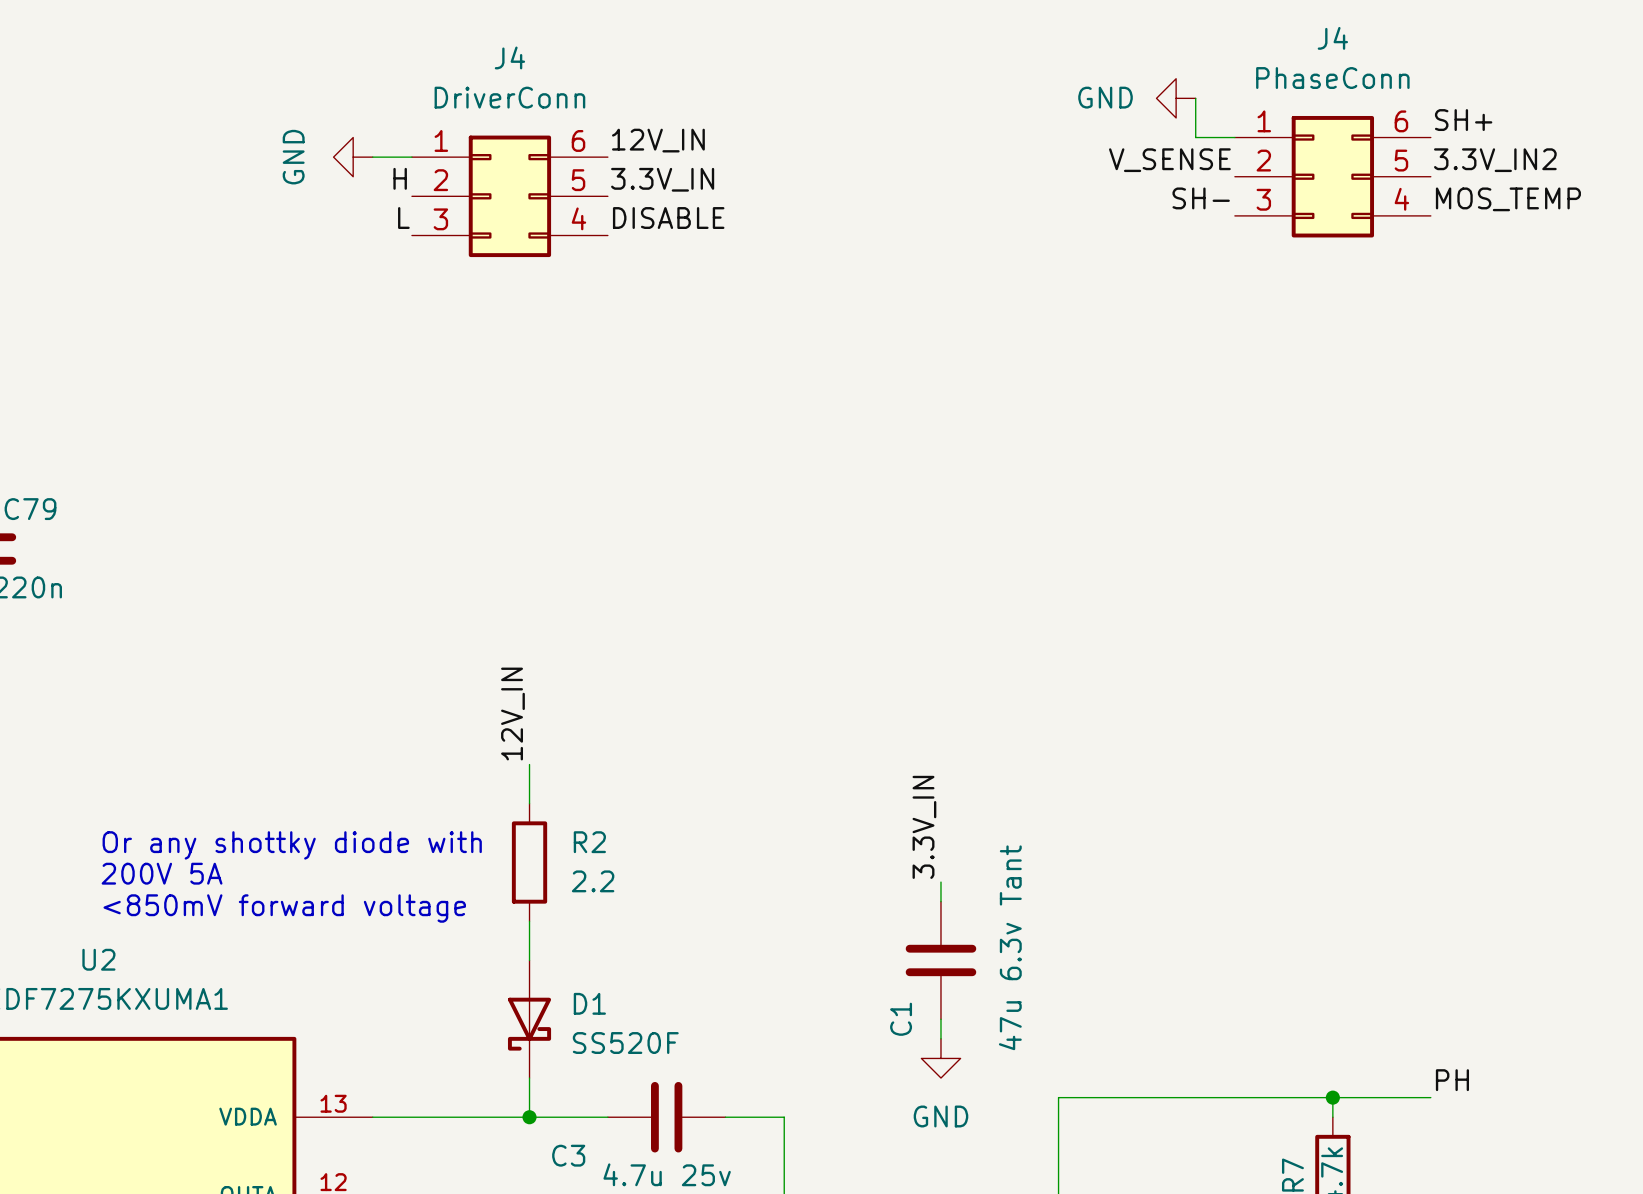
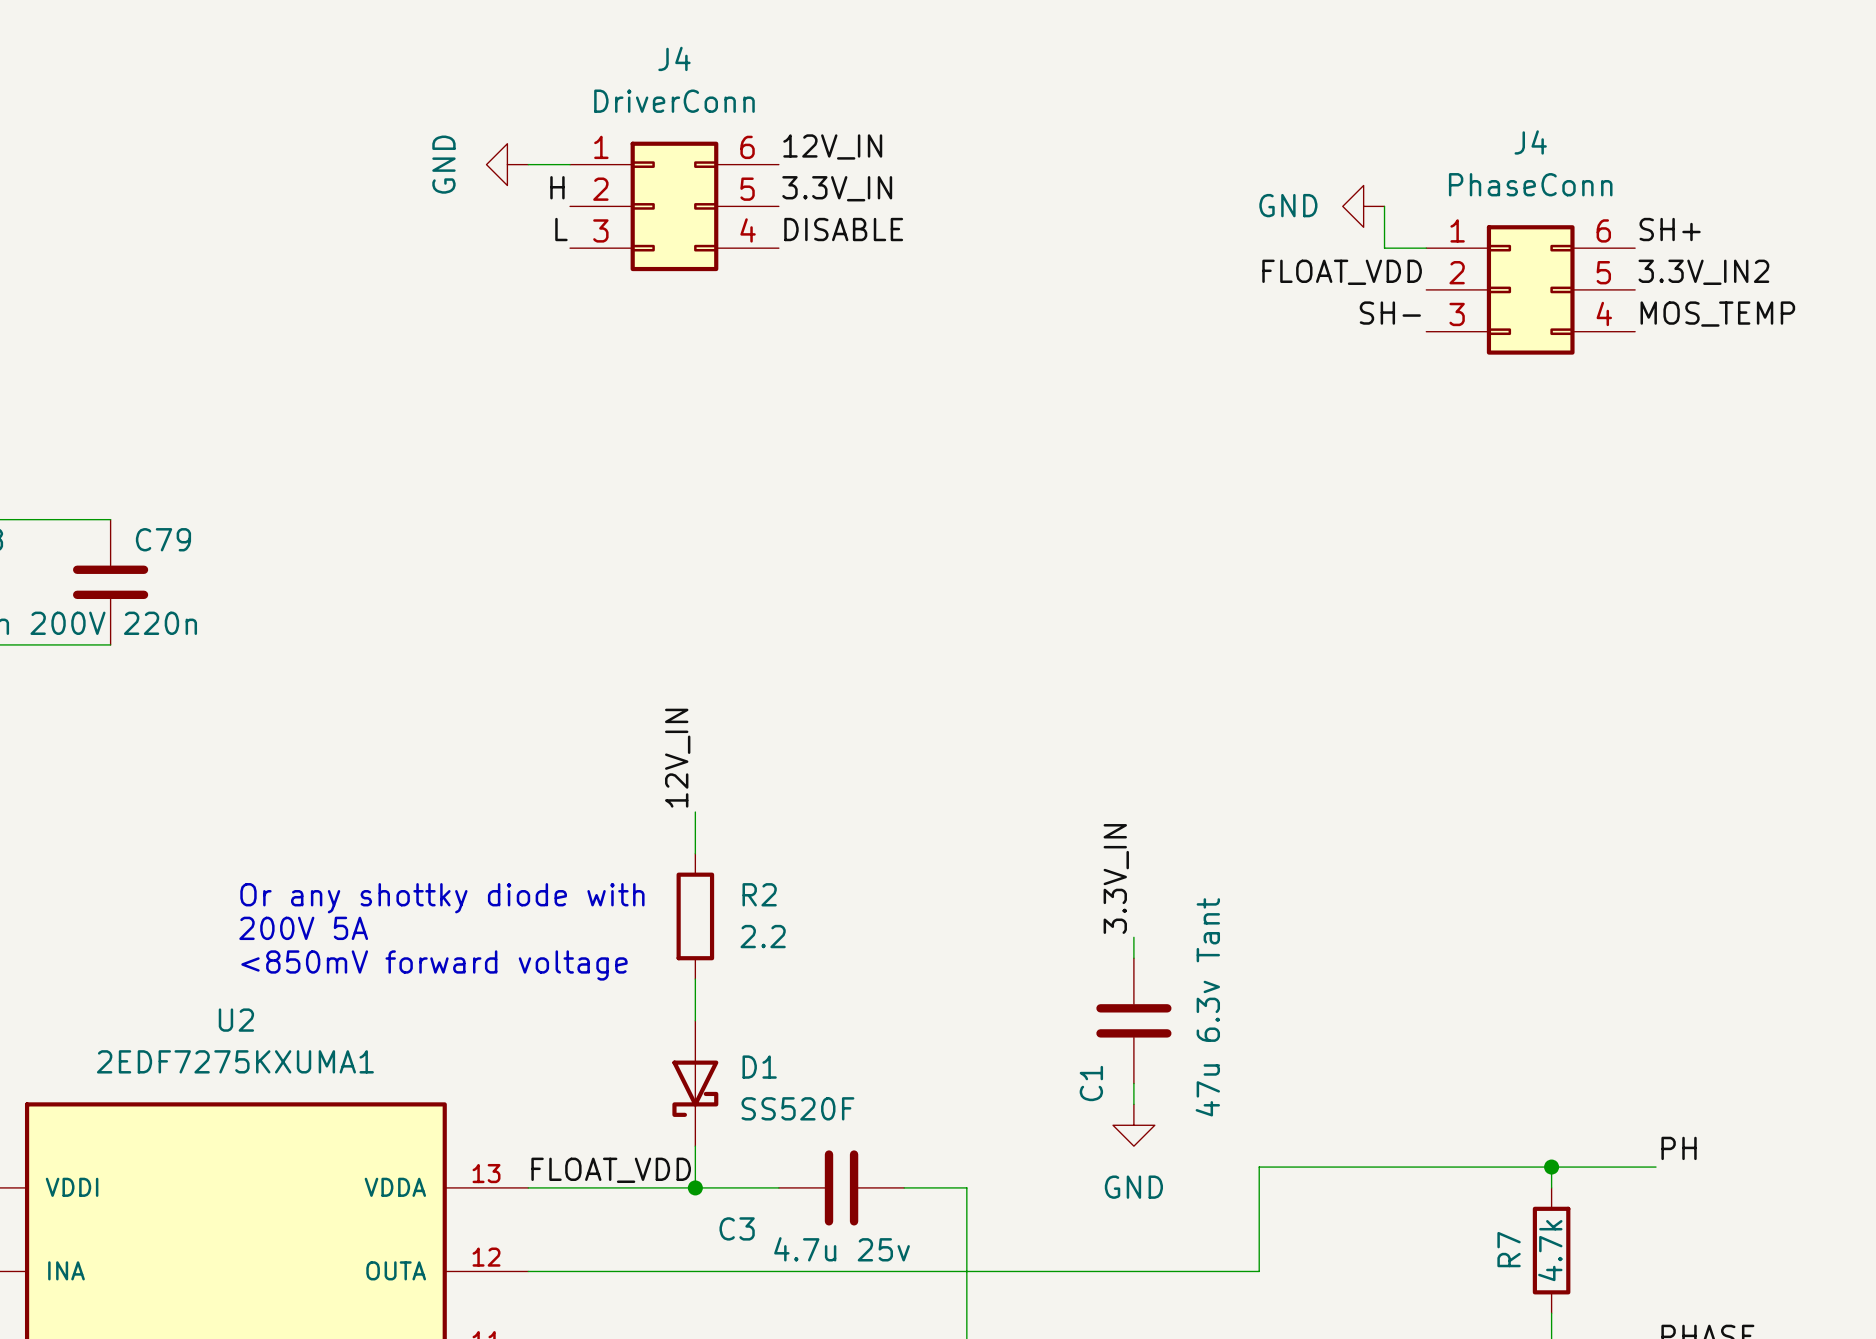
power symbol position: GND (1176, 98) -> GND (1363, 206)
wire: (1195, 98) (1195, 137) (1234, 137) -> (1384, 206) (1384, 248) (1426, 248)
label position: SH+ (1463, 120) -> SH+ (1670, 229)
label: V_SENSE (1169, 160) -> none
label position: 3.3V_IN2 (1495, 160) -> 3.3V_IN2 (1703, 272)
J4 position: (1332, 176) -> (1530, 289)
label position: SH- (1201, 198) -> SH- (1390, 313)
label position: MOS_TEMP (1508, 199) -> MOS_TEMP (1717, 314)
label: none -> FLOAT_VDD (1342, 272)
label: none -> FLOAT_VDD (611, 1170)

